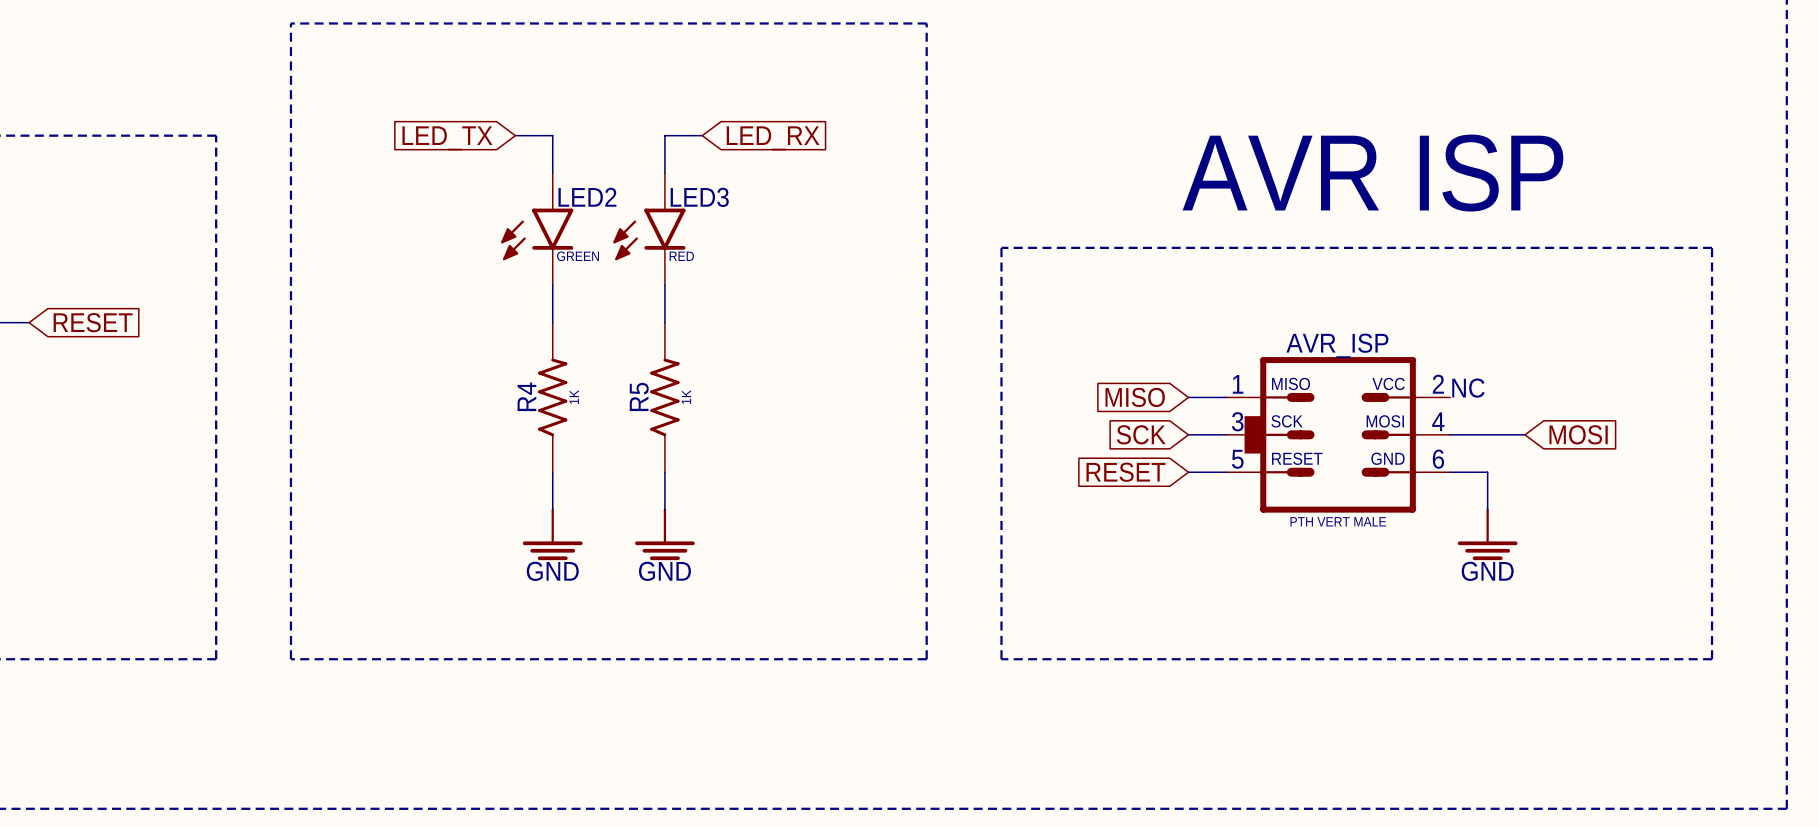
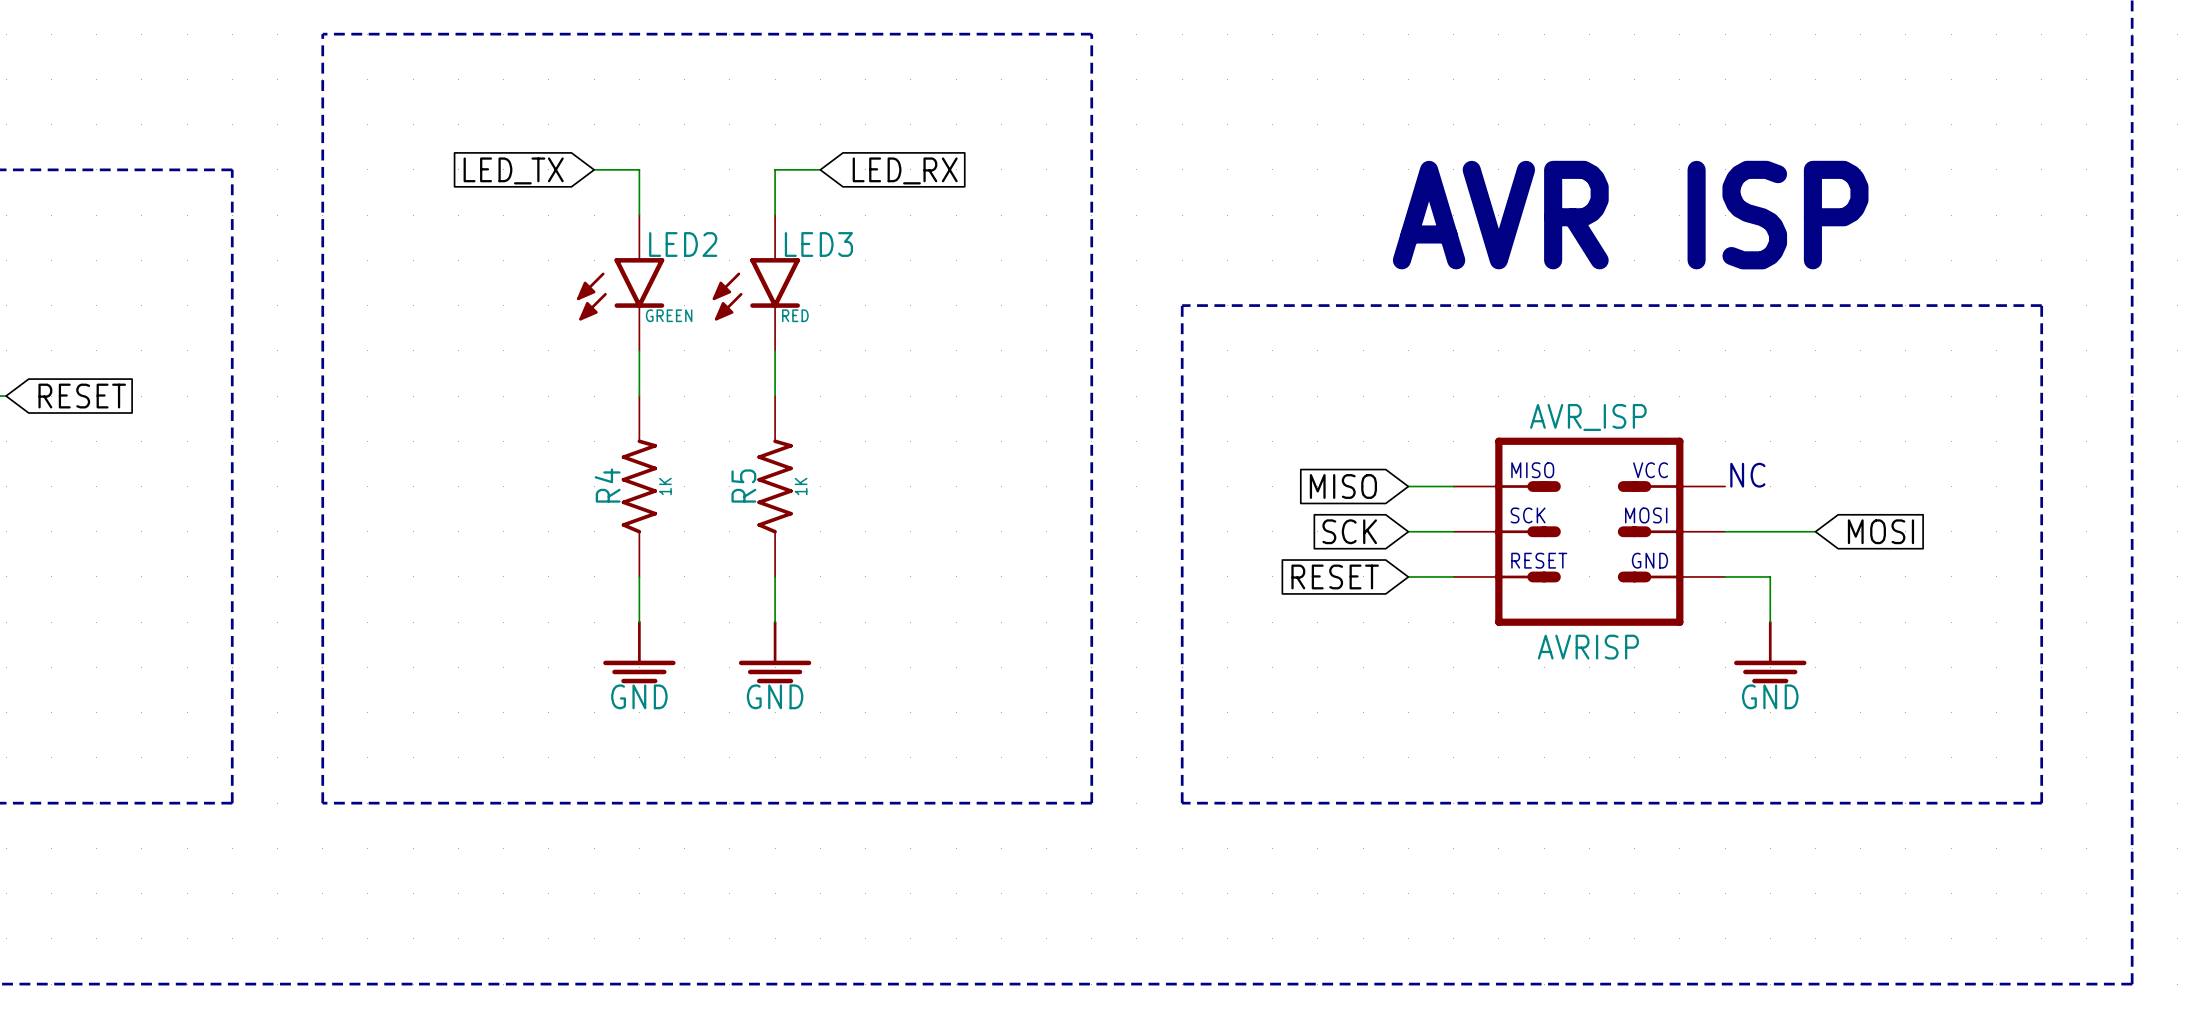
AVR_ISP symbol: [1225, 357, 1451, 513] -> [1453, 437, 1726, 626]
AVR_ISP value: PTH VERT MALE (1338, 521) -> AVRISP (1588, 647)

